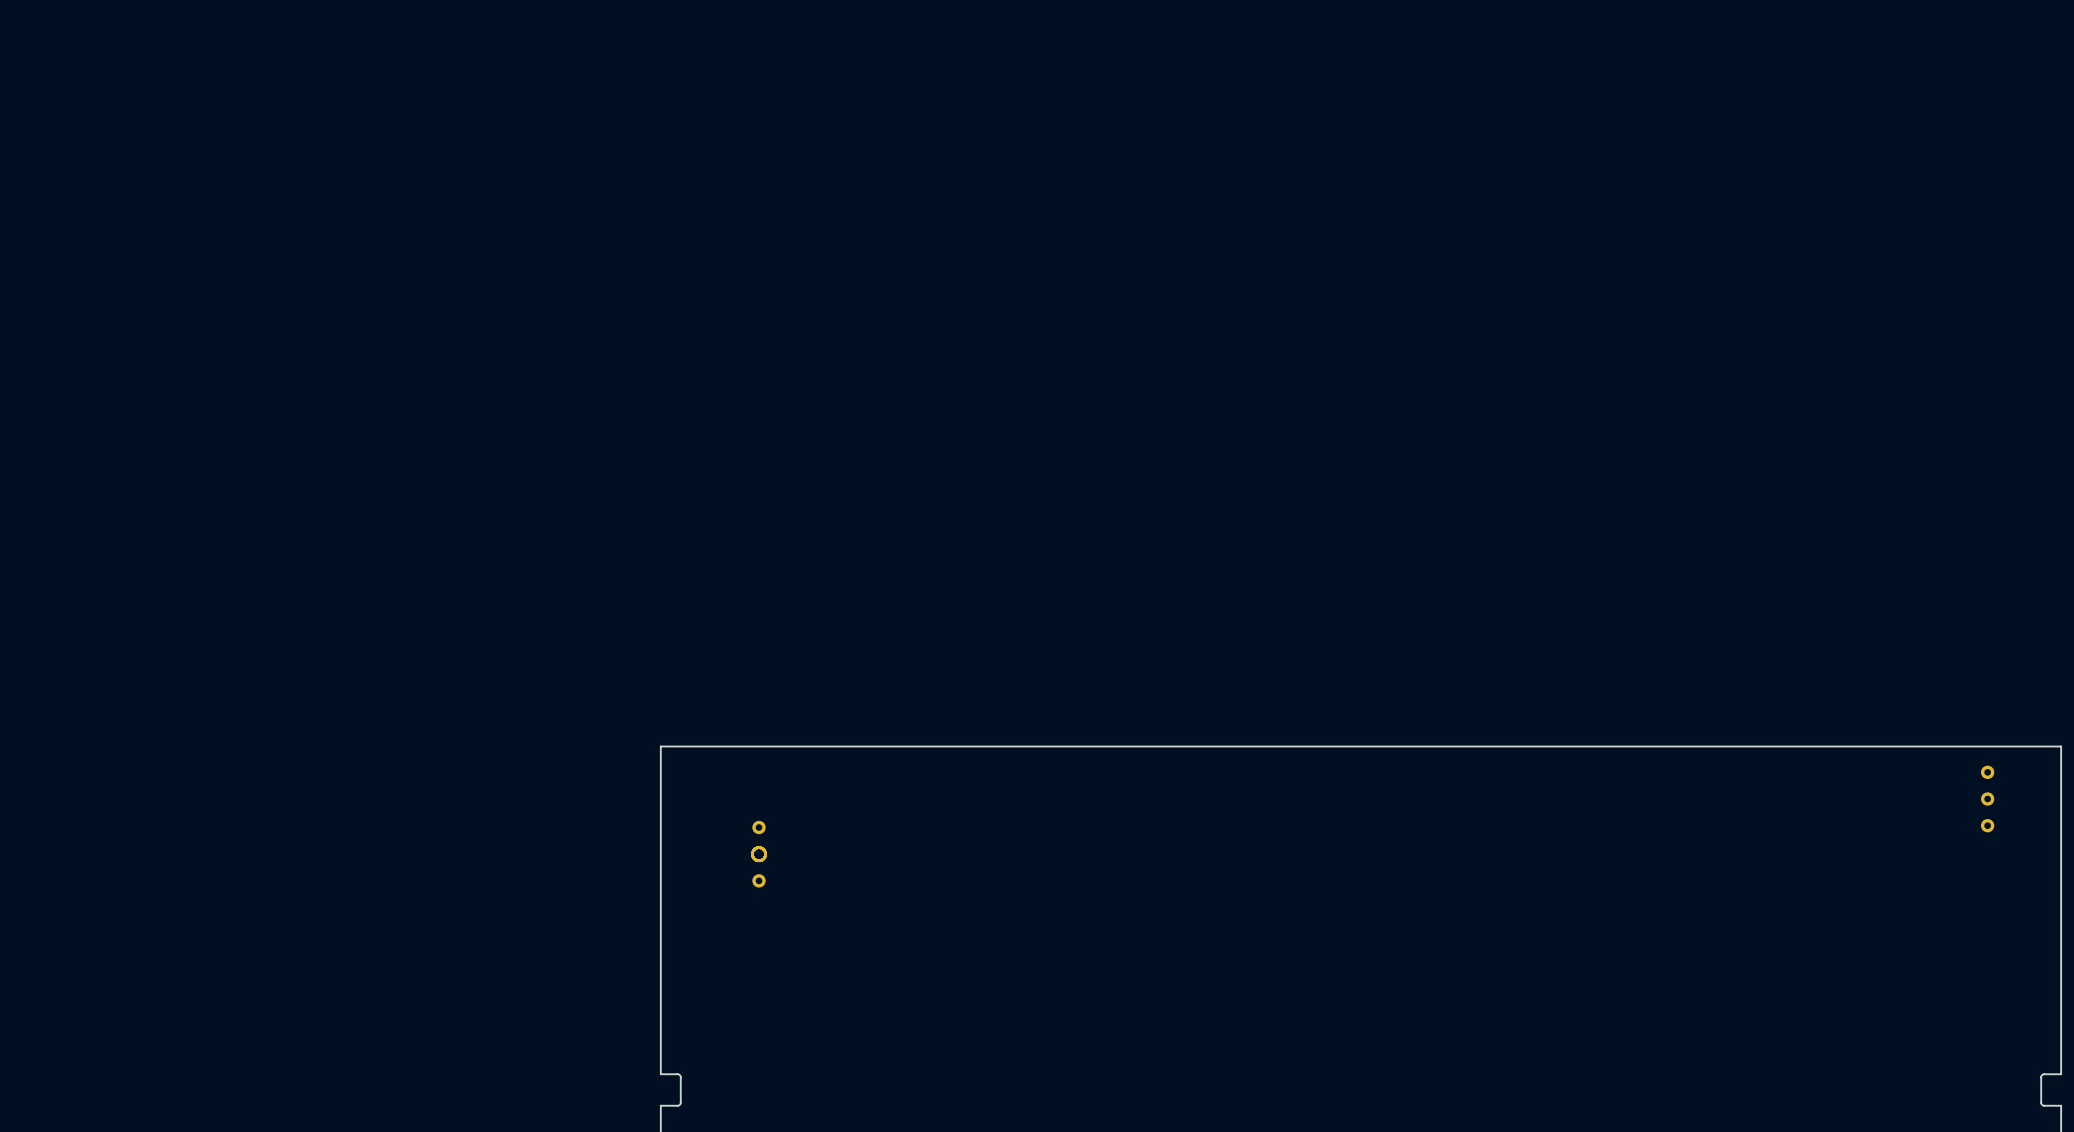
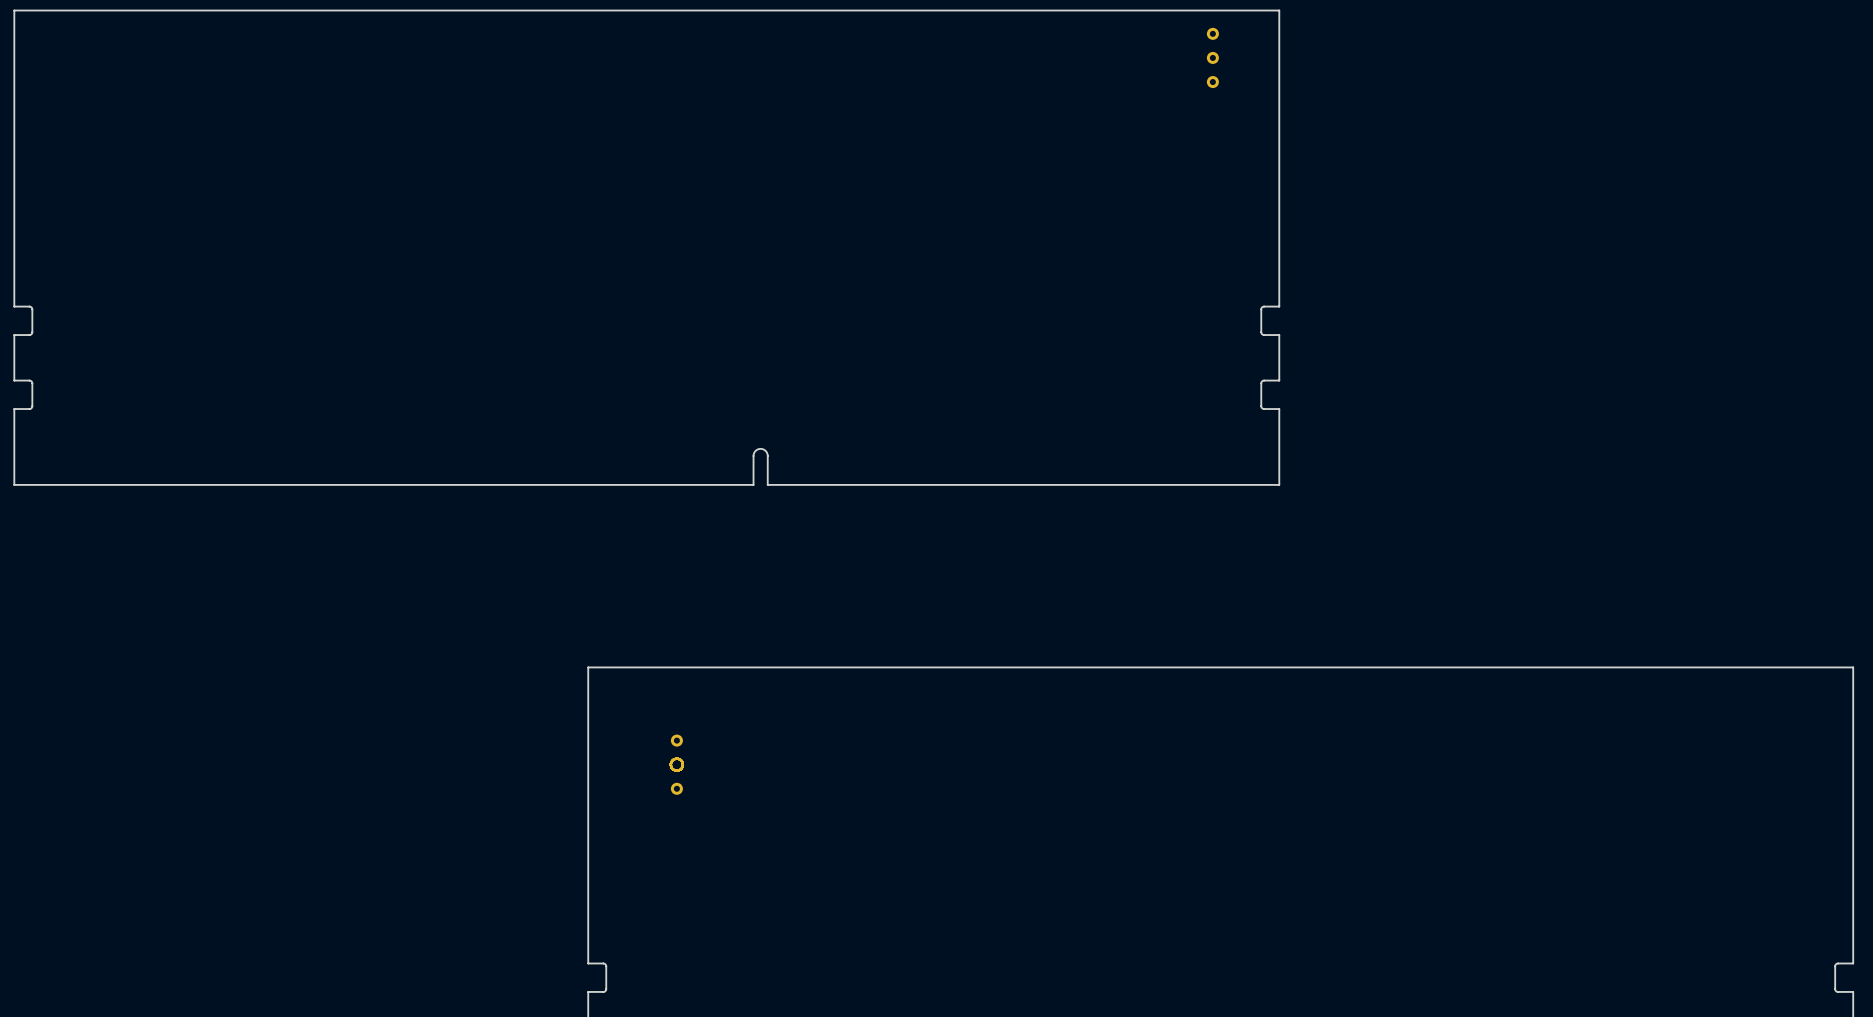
board edge: none -> (1279, 10) (14, 10) (14, 306) (29, 306) (32, 309) (31, 333) (14, 335) (14, 380) (29, 380) (32, 383) (31, 407) (14, 409) (14, 484) (753, 484) (753, 455) (755, 450) (760, 448) (765, 450) (767, 455) (767, 484) (1279, 484) (1279, 409) (1263, 409) (1261, 406) (1261, 381) (1279, 380) (1279, 335) (1263, 335) (1261, 332) (1261, 307) (1279, 306) (1279, 10)
part: none -> (1212, 57)
part: (1987, 799) -> none

